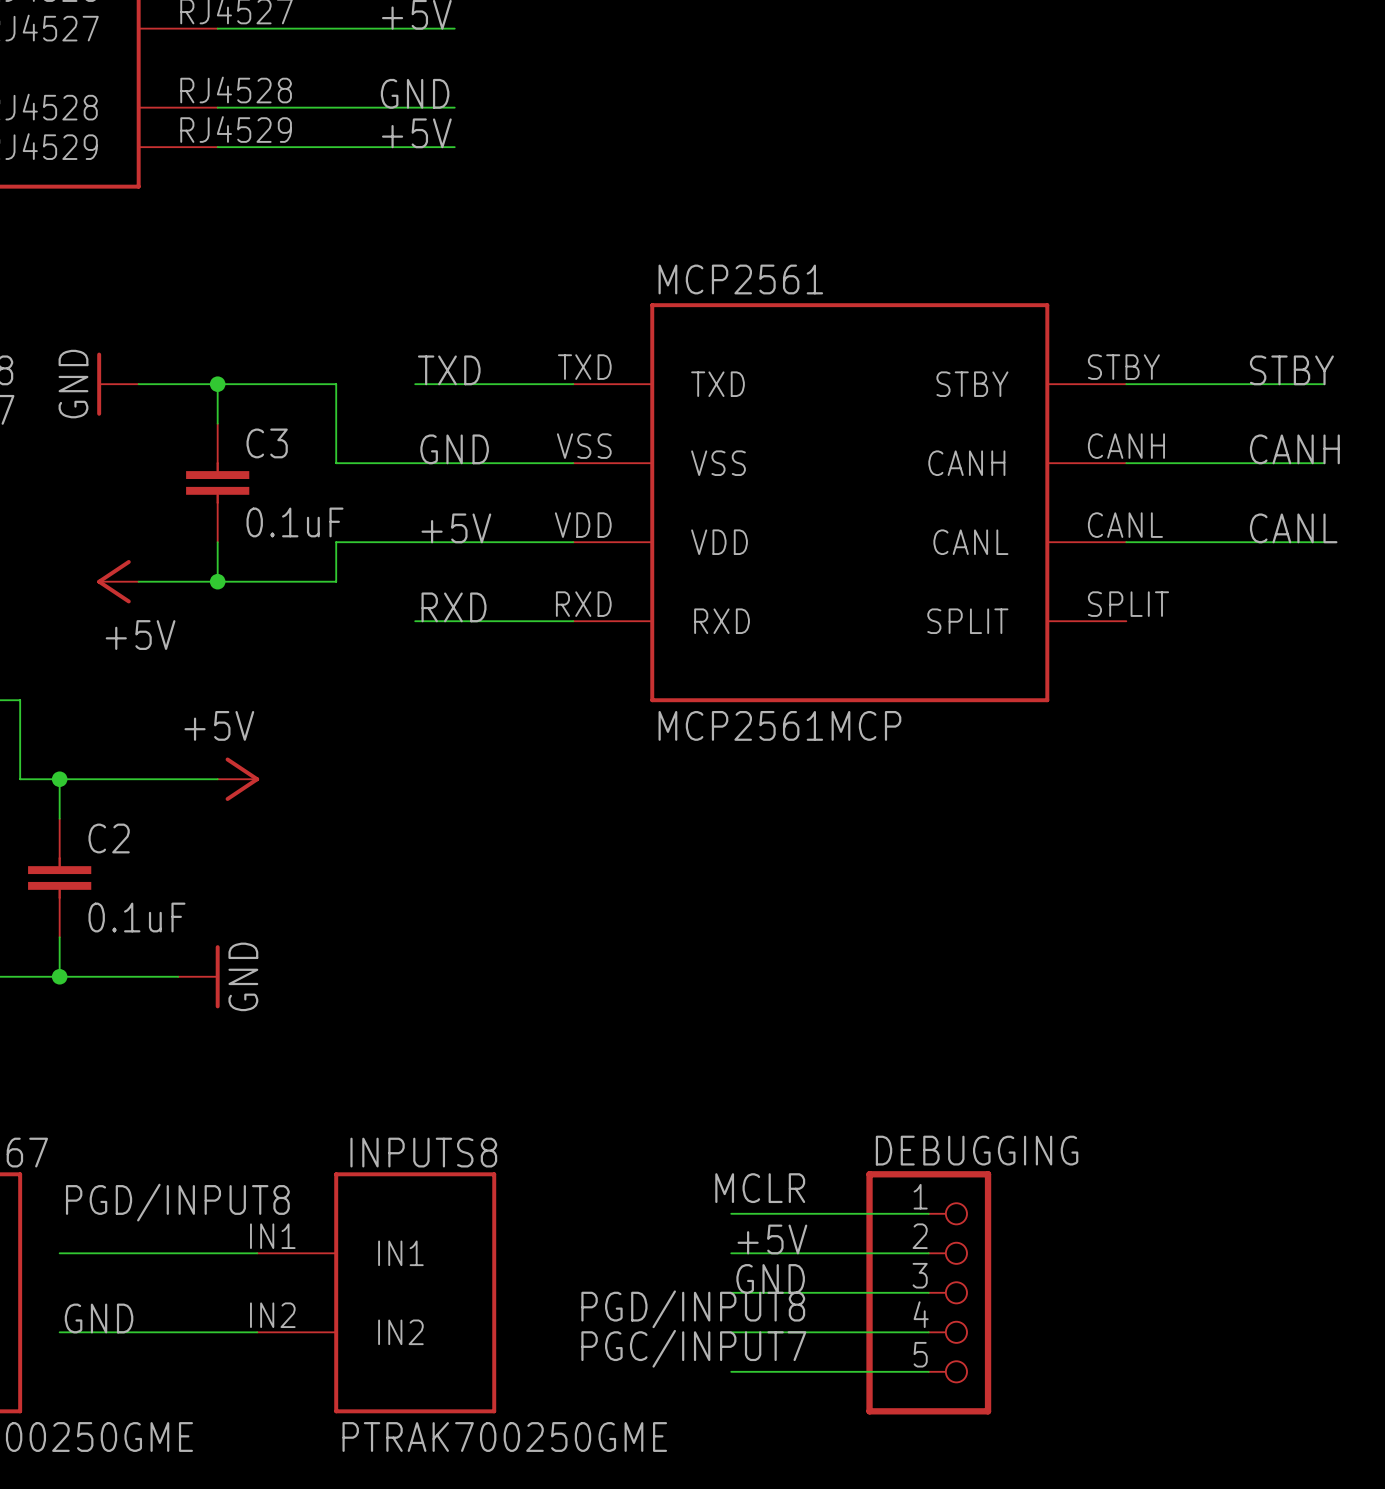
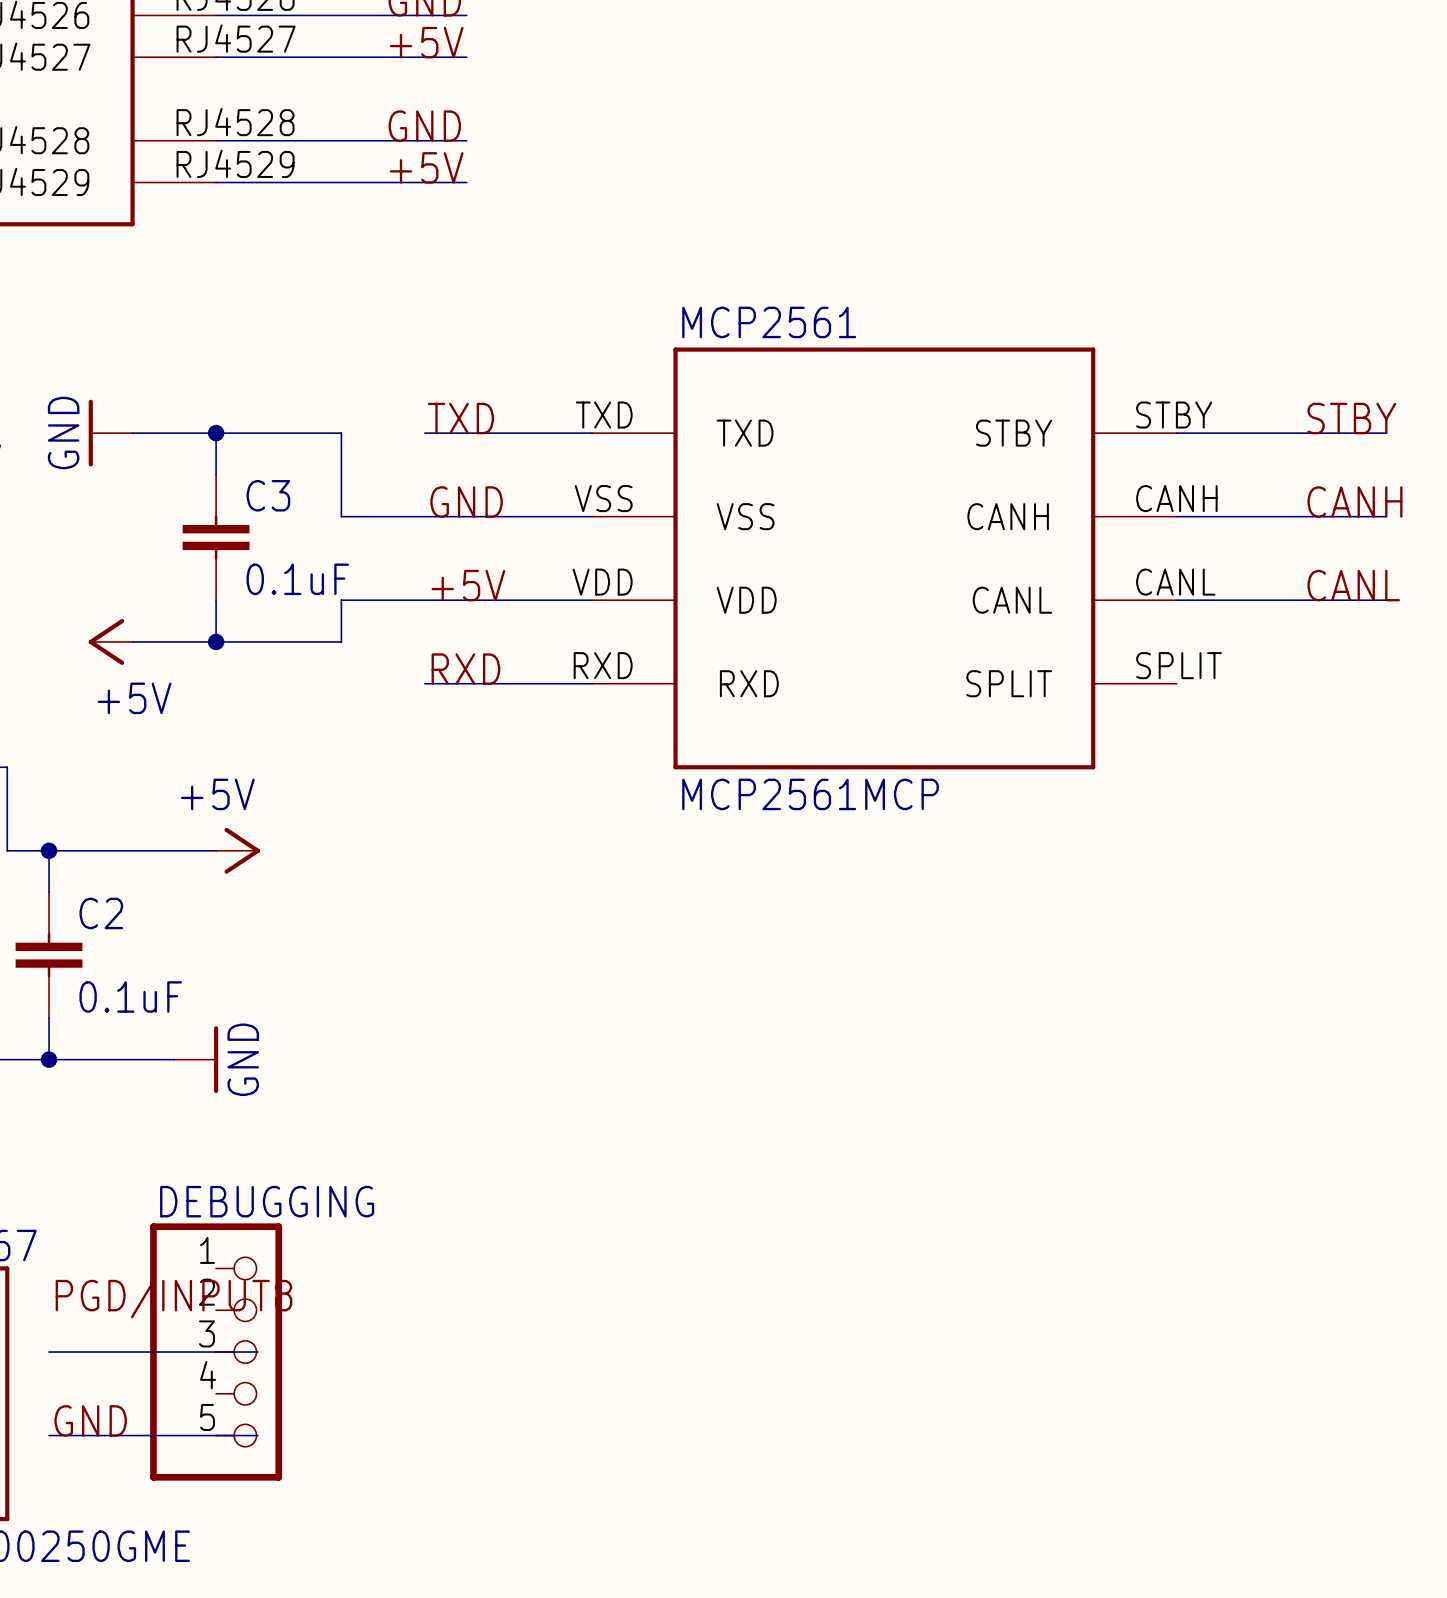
label: MCLR (760, 1188) -> none
wire: (731, 1213) (928, 1213) -> none
label: +5V (772, 1239) -> none
DEBUGGING: none -> (216, 1352)
wire: (731, 1253) (928, 1253) -> none
label: GND (770, 1278) -> none
INPUTS8: PTRAK700250GME (376, 1292) -> none
wire: (731, 1292) (928, 1292) -> none
DEBUGGING: (928, 1292) -> none
label: PGD/INPUT8 (693, 1309) -> none
wire: (731, 1332) (928, 1332) -> none
label: PGC/INPUT7 (693, 1348) -> none
wire: (731, 1371) (928, 1371) -> none

